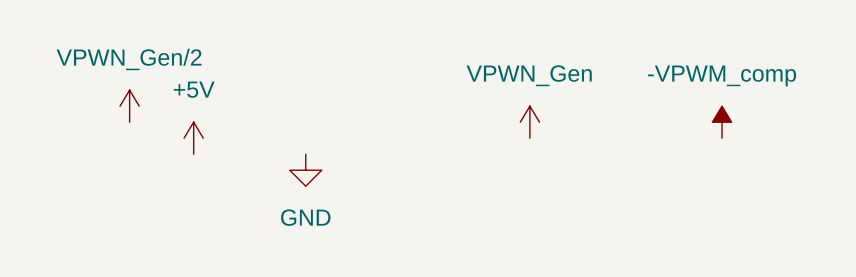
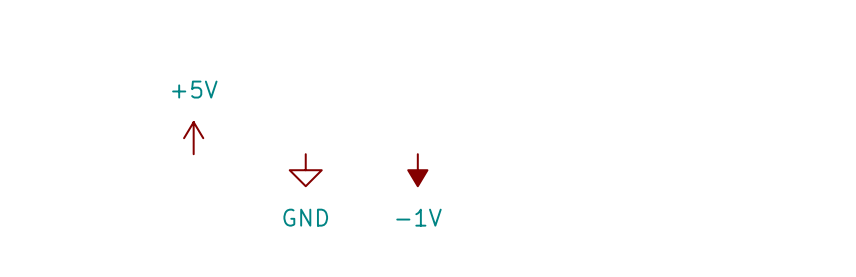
power symbol: VPWN_Gen/2 (129, 106) -> none
power symbol: VPWN_Gen (529, 122) -> none
power symbol: -VPWM_comp (722, 122) -> none
power symbol: none -> -1V (417, 170)

